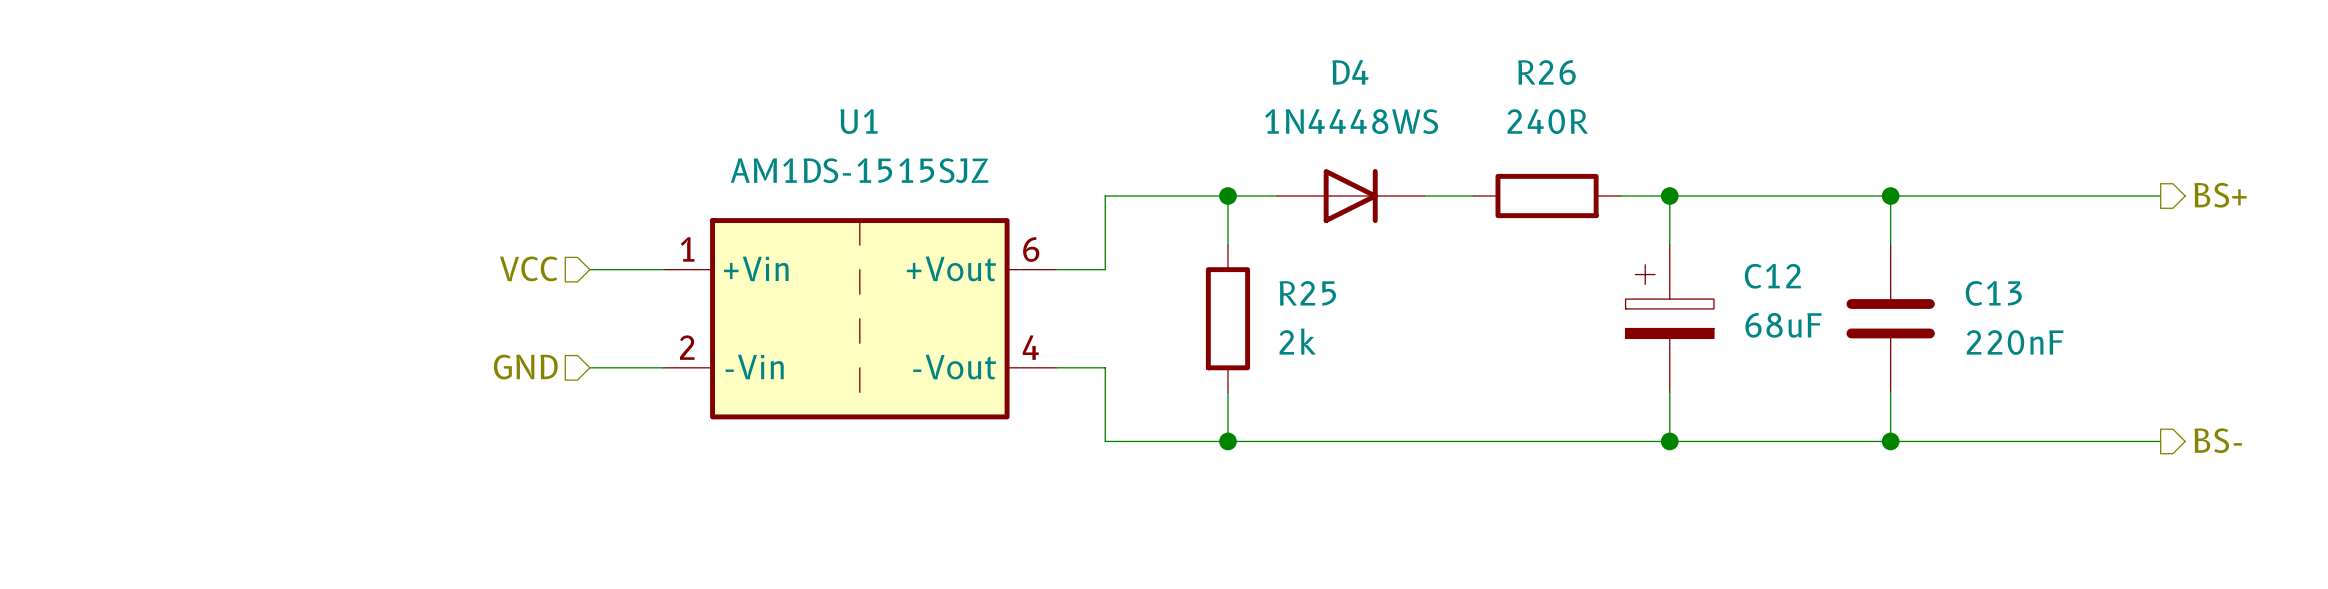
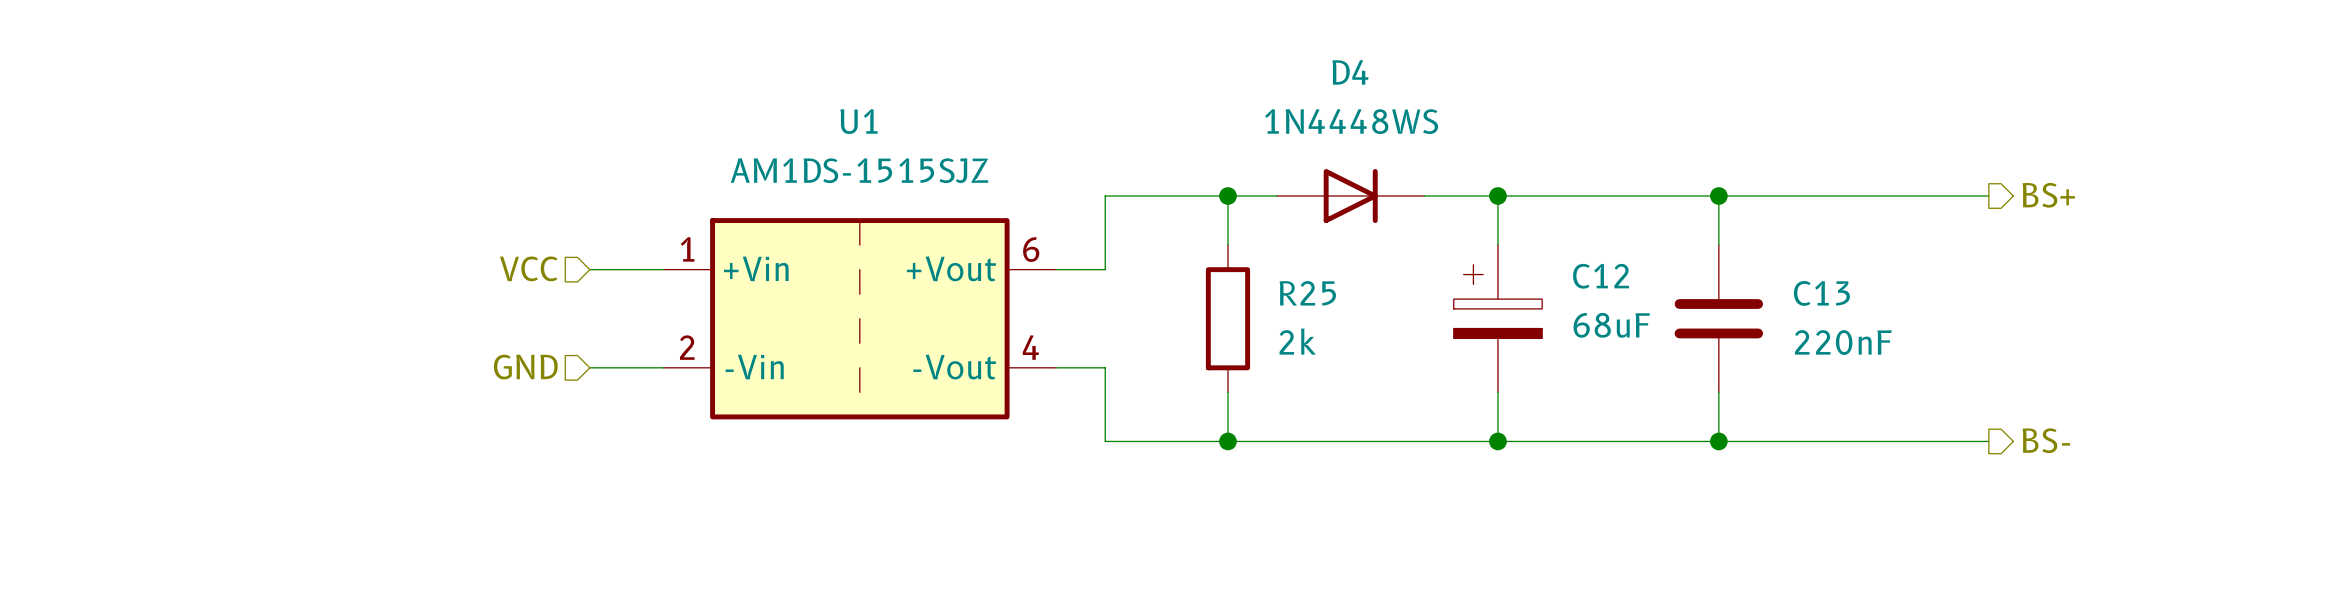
hierarchical label position: BS+ (2220, 195) -> BS+ (2048, 195)
wire: none -> (1473, 196) (1620, 196)
junction: none -> (1497, 196)
R26: 240R (1547, 196) -> none
wire: (1669, 196) (1669, 245) -> (1497, 196) (1497, 245)
junction position: (1669, 196) -> (1718, 196)
wire: (1890, 196) (1890, 245) -> (1718, 196) (1718, 245)
junction: (1890, 196) -> none
wire: (1988, 196) (2160, 196) -> none
C12 position: (1669, 318) -> (1497, 318)
C13 position: (1890, 318) -> (1718, 318)
wire: (1669, 392) (1669, 441) -> (1497, 392) (1497, 441)
wire: (1890, 392) (1890, 441) -> (1718, 392) (1718, 441)
hierarchical label position: BS- (2218, 440) -> BS- (2046, 440)
junction: none -> (1497, 441)
junction position: (1669, 441) -> (1718, 441)
junction: (1890, 441) -> none
wire: (1988, 441) (2160, 441) -> none

